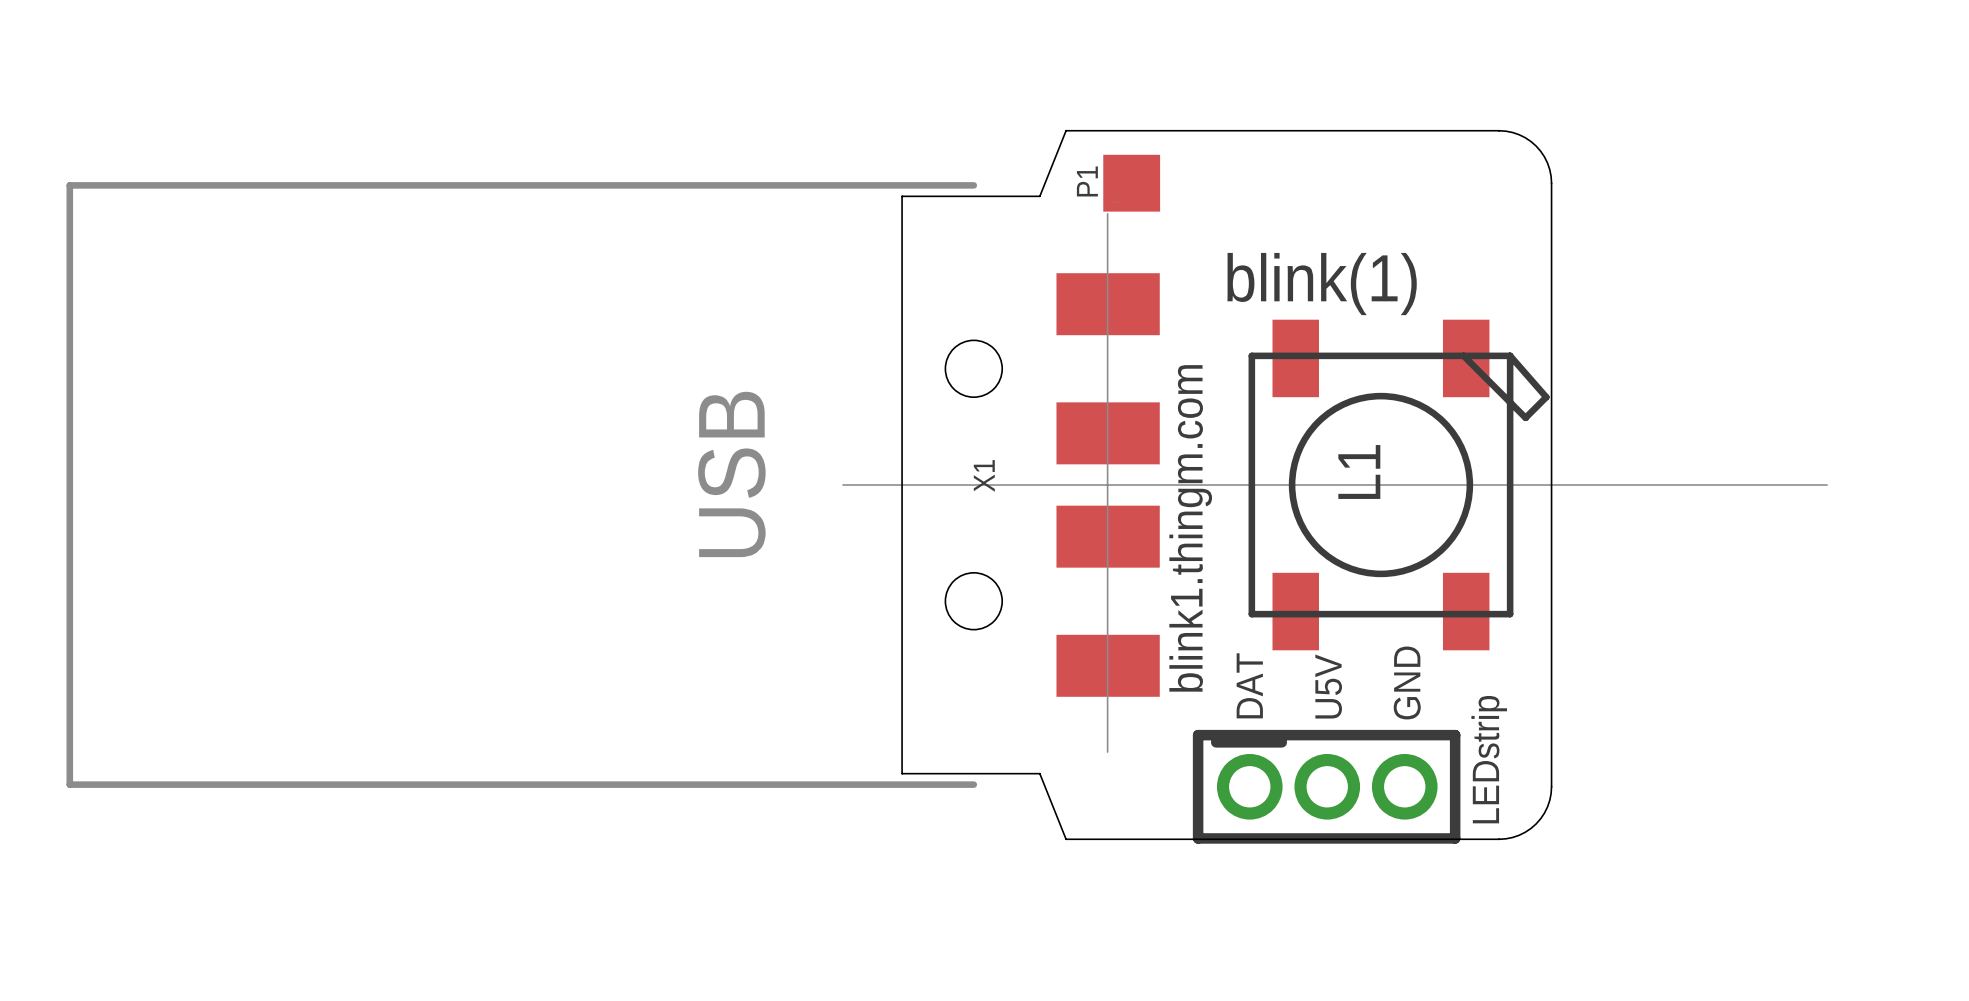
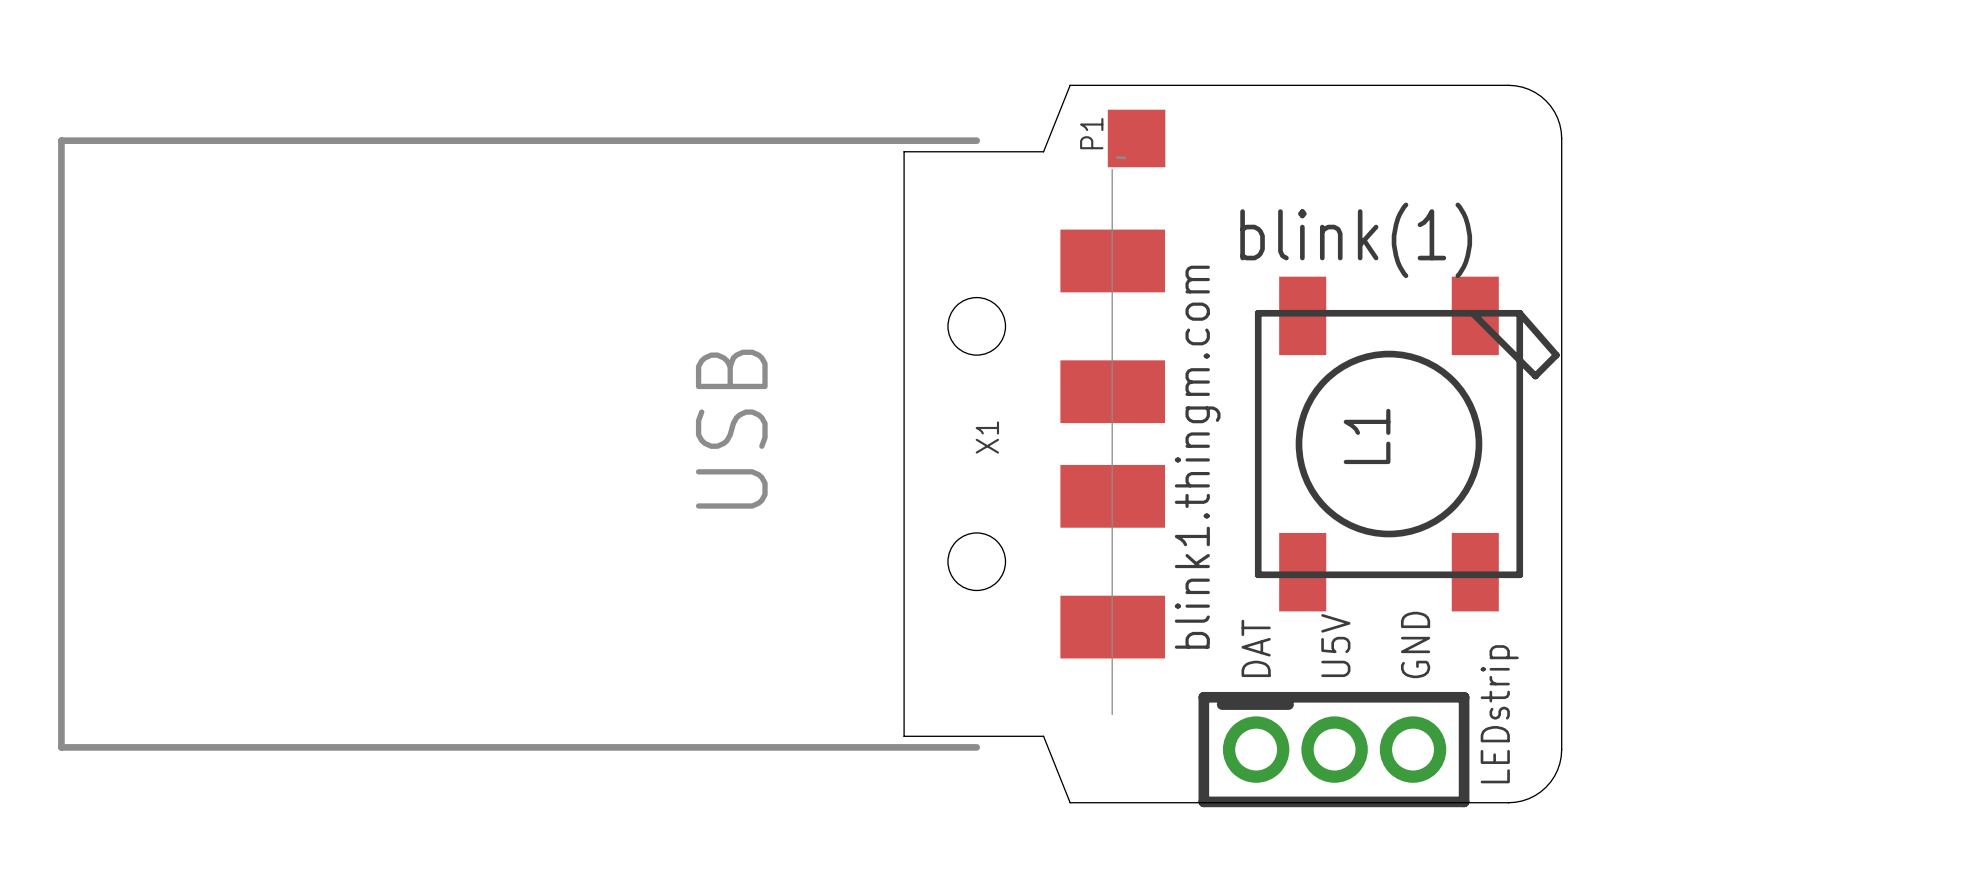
line: (843, 485) (1827, 485) -> none

